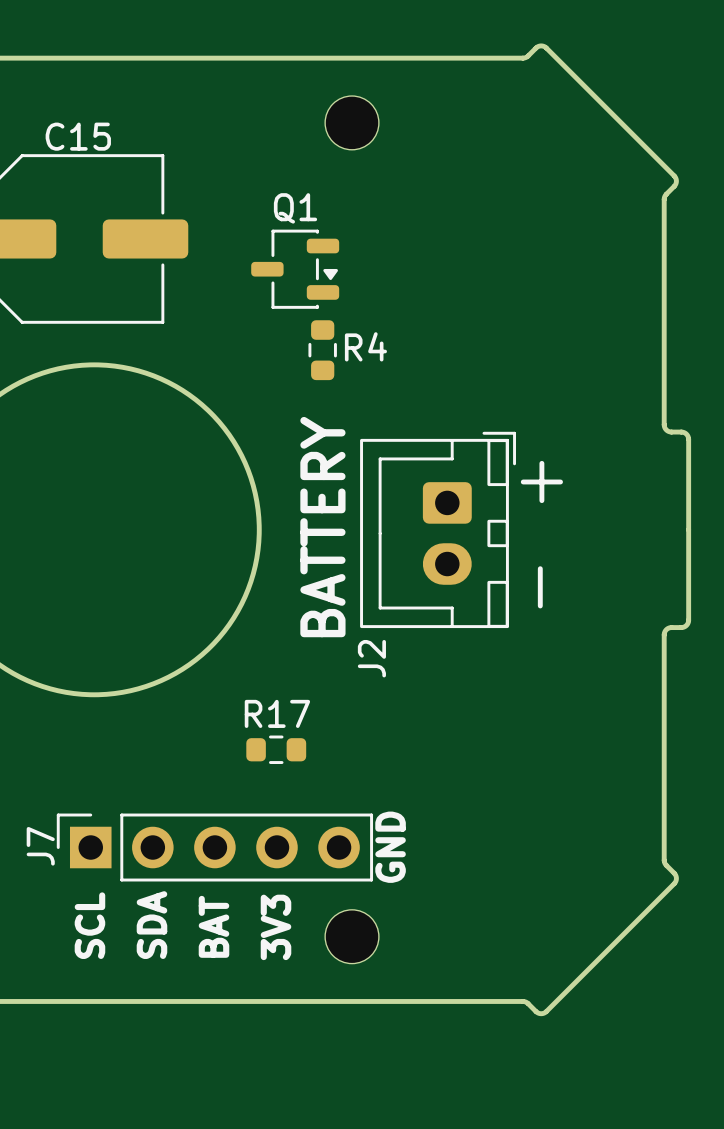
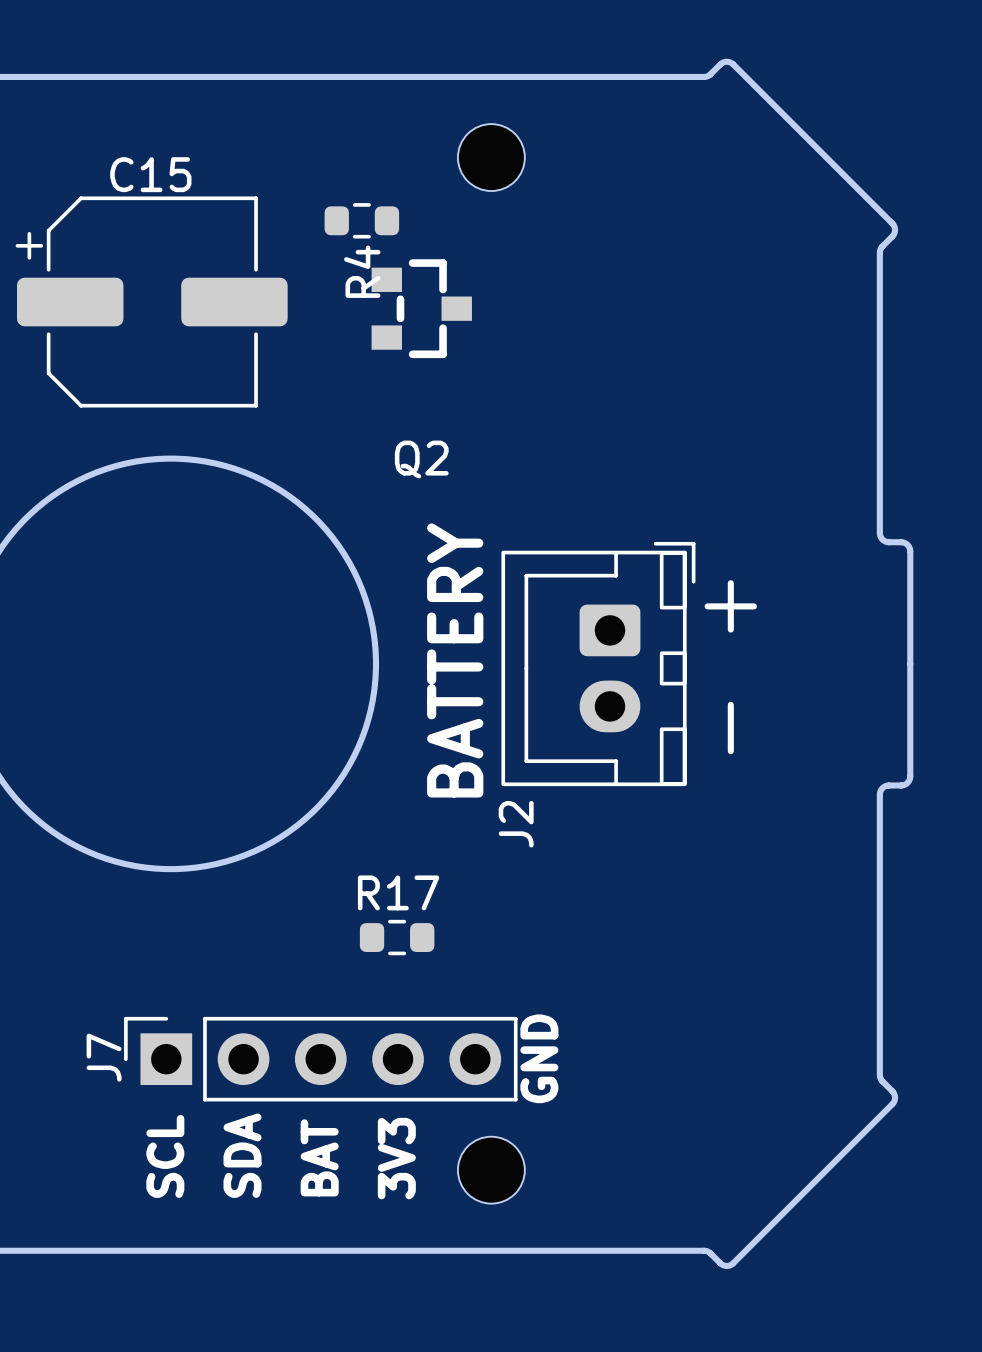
Q2: none -> (421, 308)
Q1: (295, 269) -> none
R4 rotation: 0° (322, 350) -> 90° clockwise (361, 220)
R4 position: (322, 350) -> (361, 220)
text: + (541, 481) -> none
text: - (540, 587) -> - + (730, 667)

